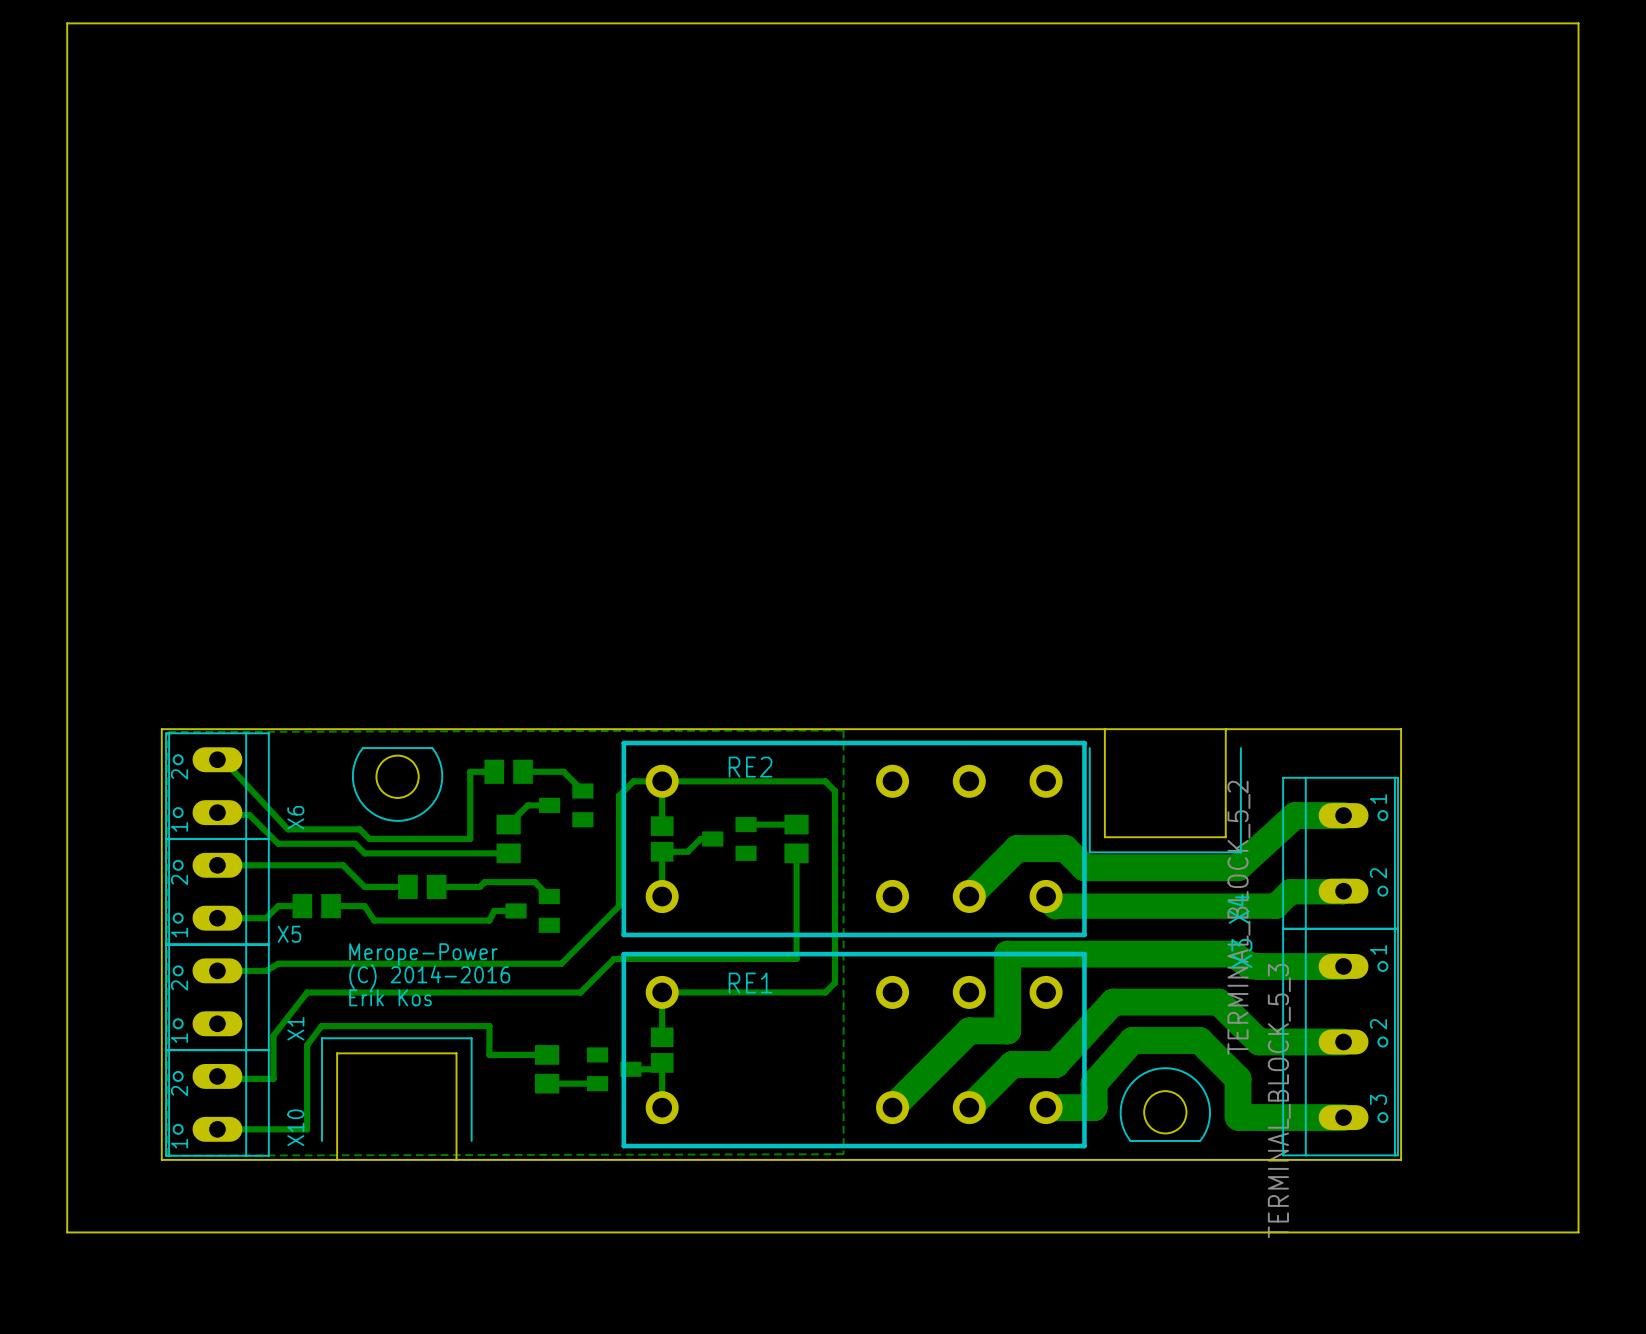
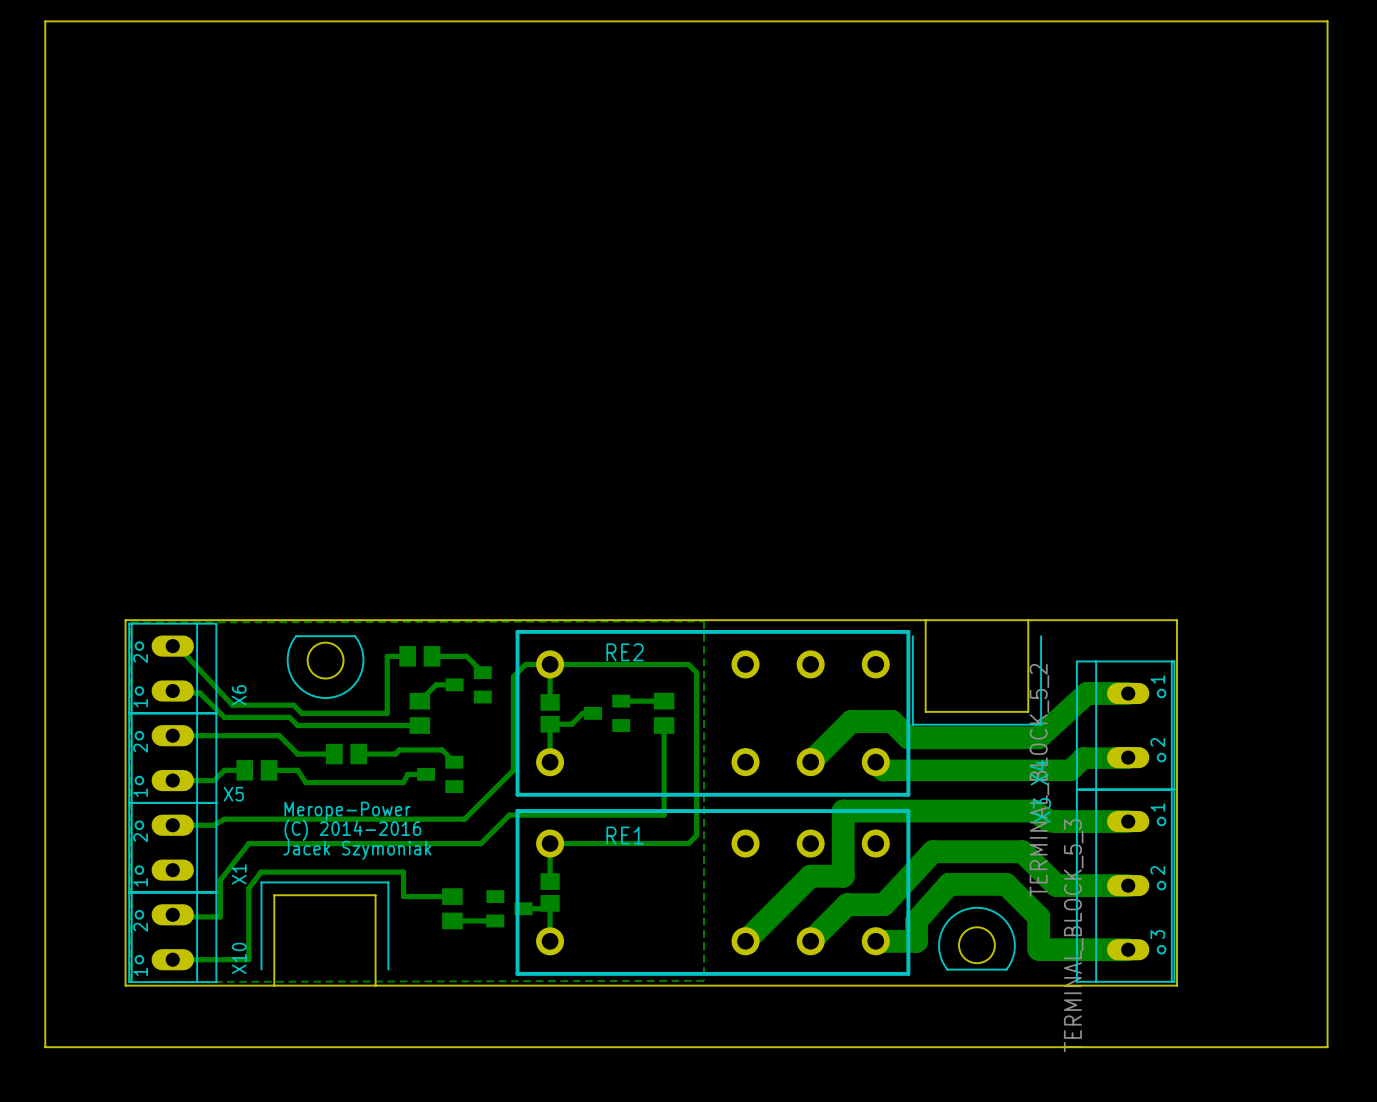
text: Erik Kos (390, 997) -> Jacek Szymoniak (357, 850)

